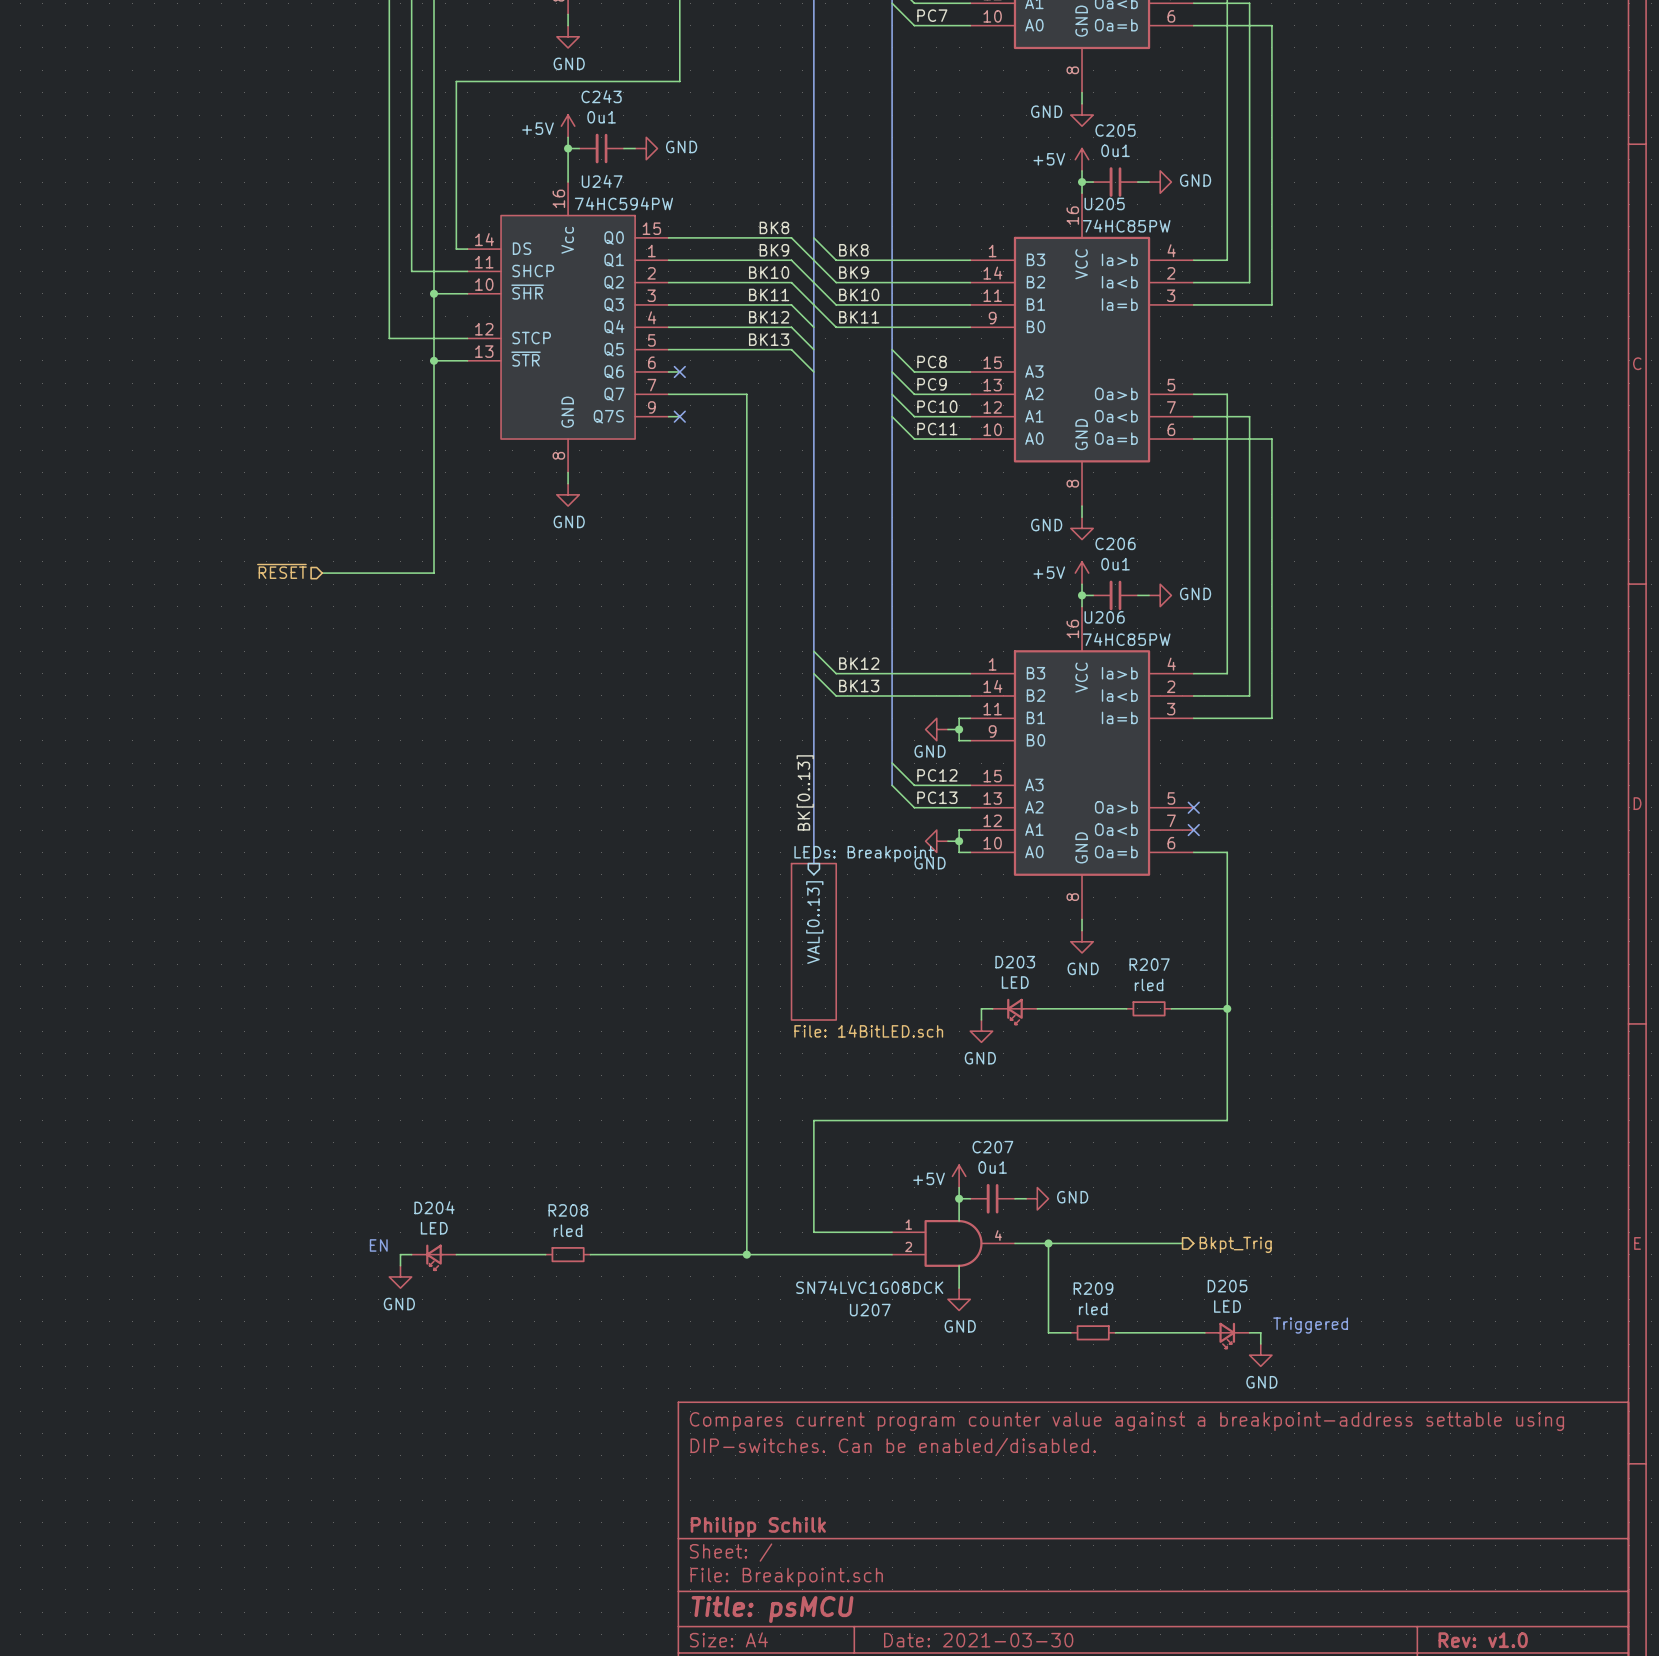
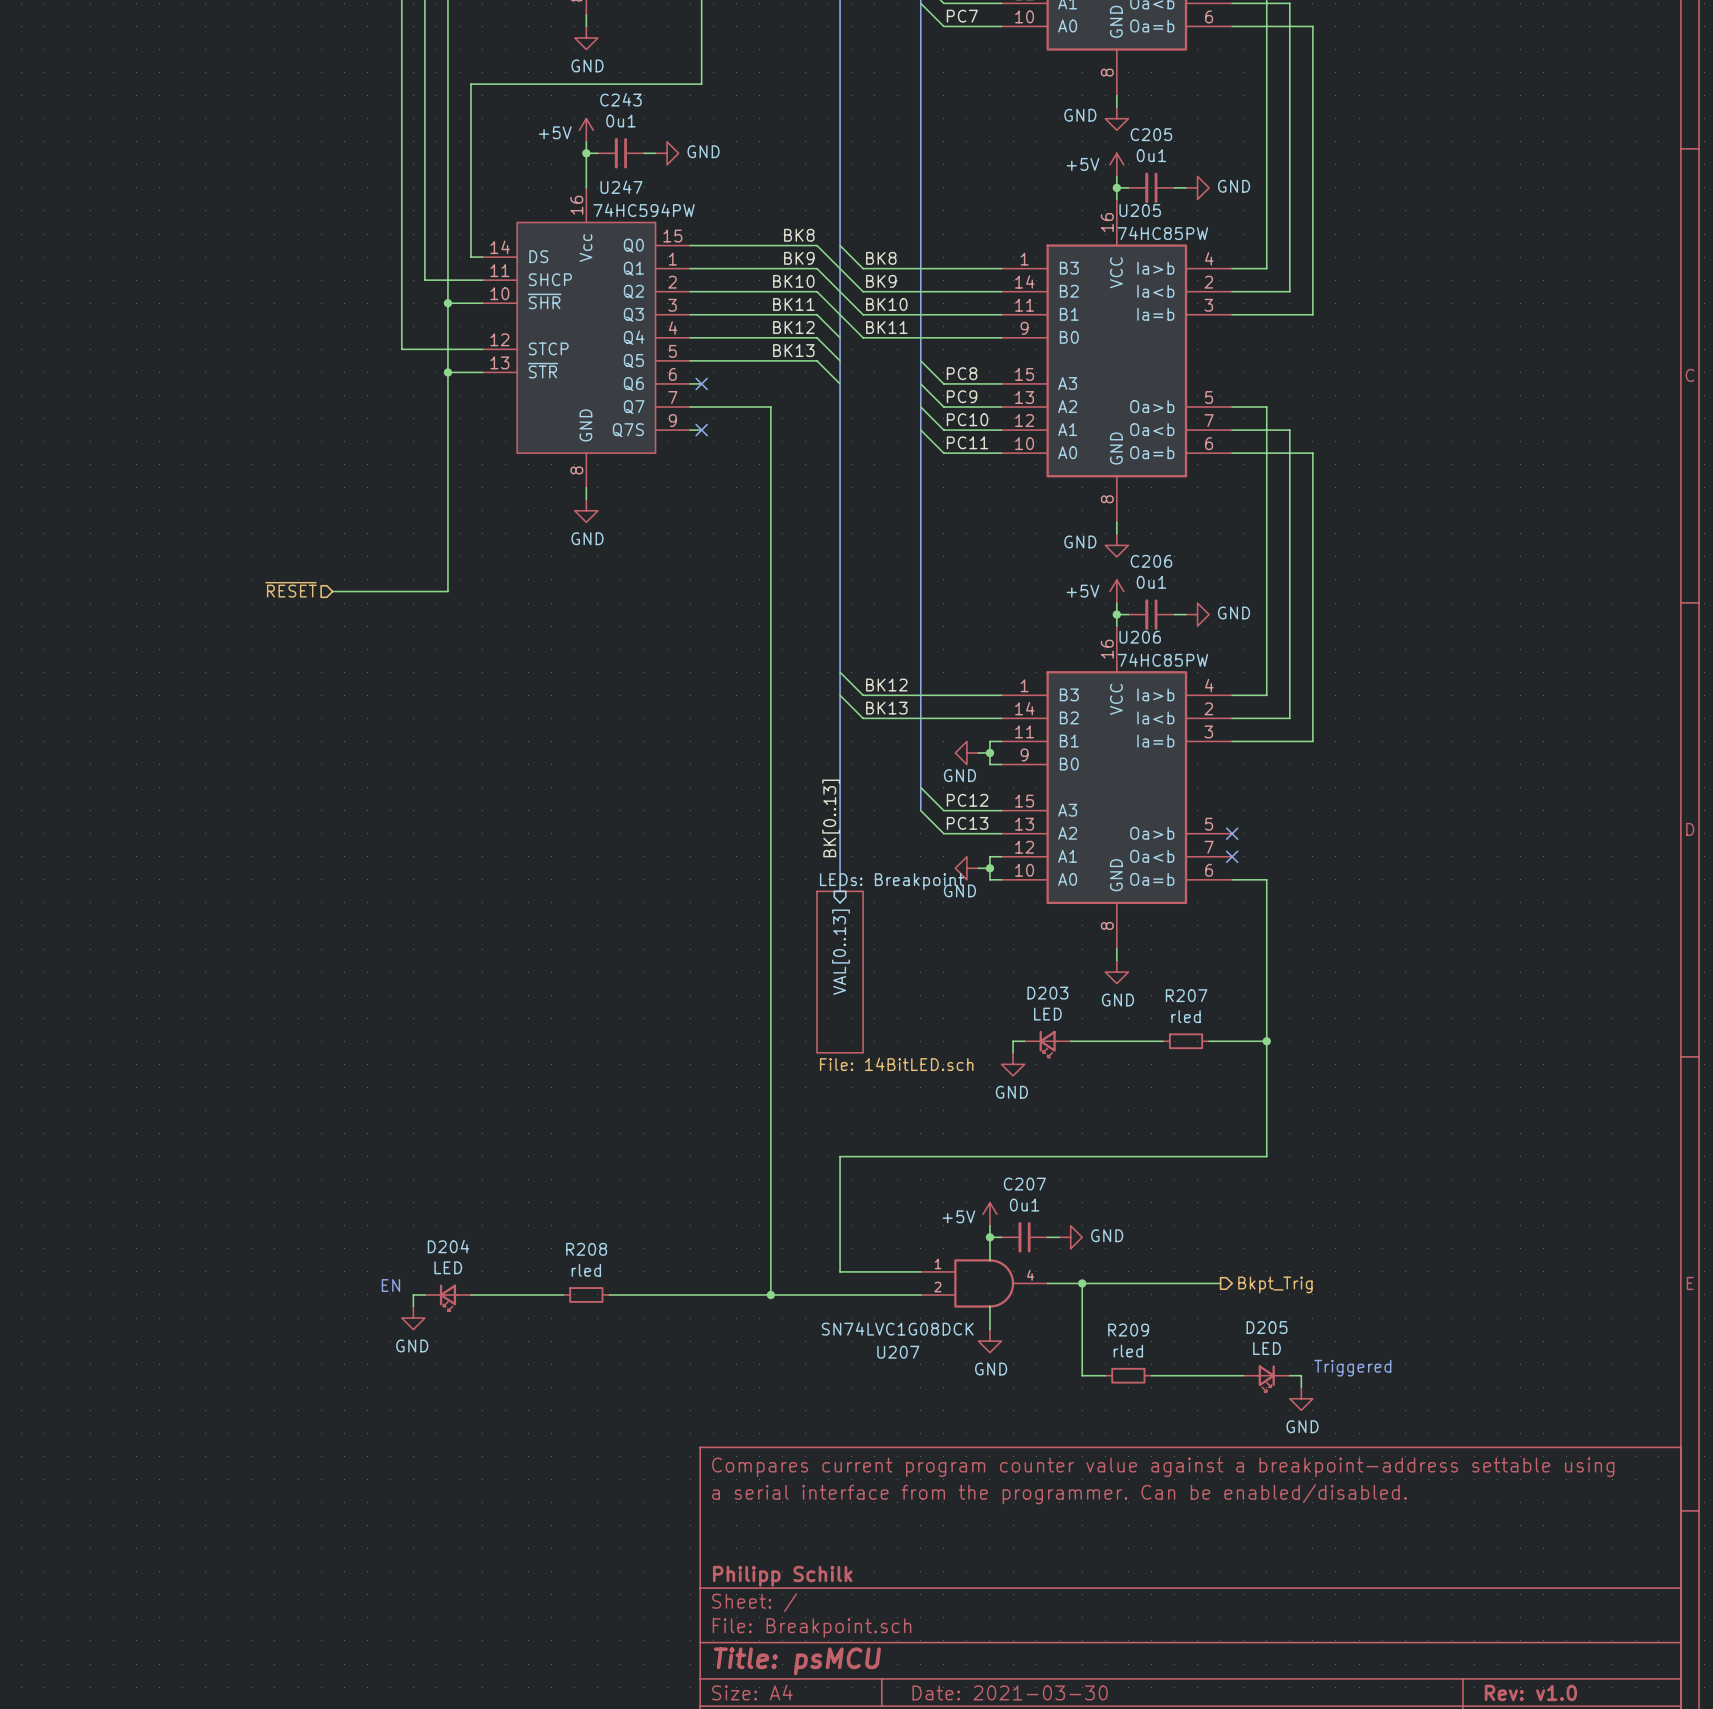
title block: DIP-switches. Can be enabled/disabled. (893, 1447) -> a serial interface from the programmer. Can be enabled/disabled. (1059, 1494)

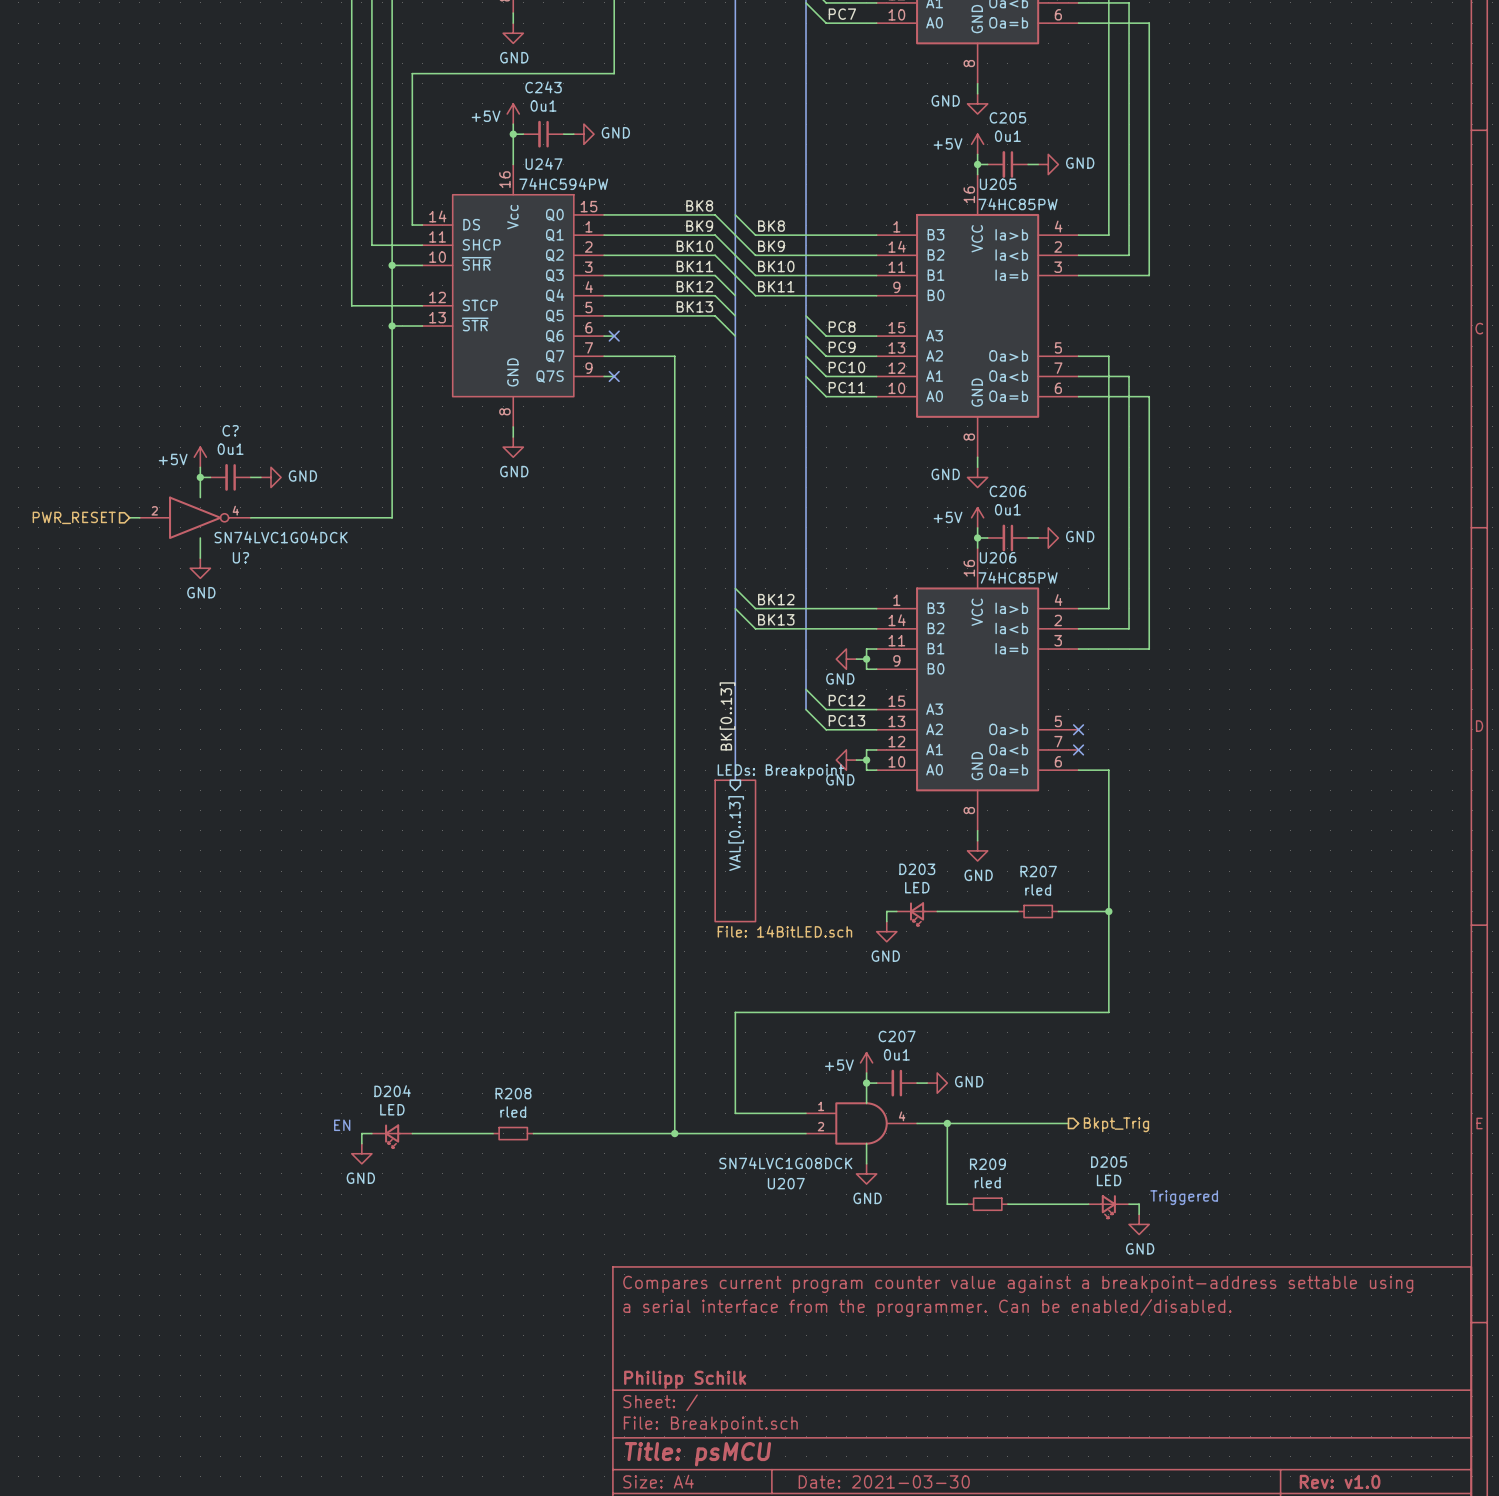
power symbol: none -> +5V (200, 457)
wire: none -> (200, 467) (200, 497)
wire: none -> (200, 477) (210, 477)
junction: none -> (200, 477)
C?: none -> 0u1 (230, 477)
wire: none -> (250, 477) (260, 477)
power symbol: none -> GND (270, 477)
hierarchical label: ~{RESET} (291, 589) -> none
hierarchical label: none -> PWR_RESET (74, 517)
wire: none -> (129, 517) (139, 517)
U?: none -> SN74LVC1G04DCK (195, 517)
wire: none -> (250, 517) (291, 517)
wire: none -> (200, 537) (200, 558)
power symbol: none -> GND (200, 568)

